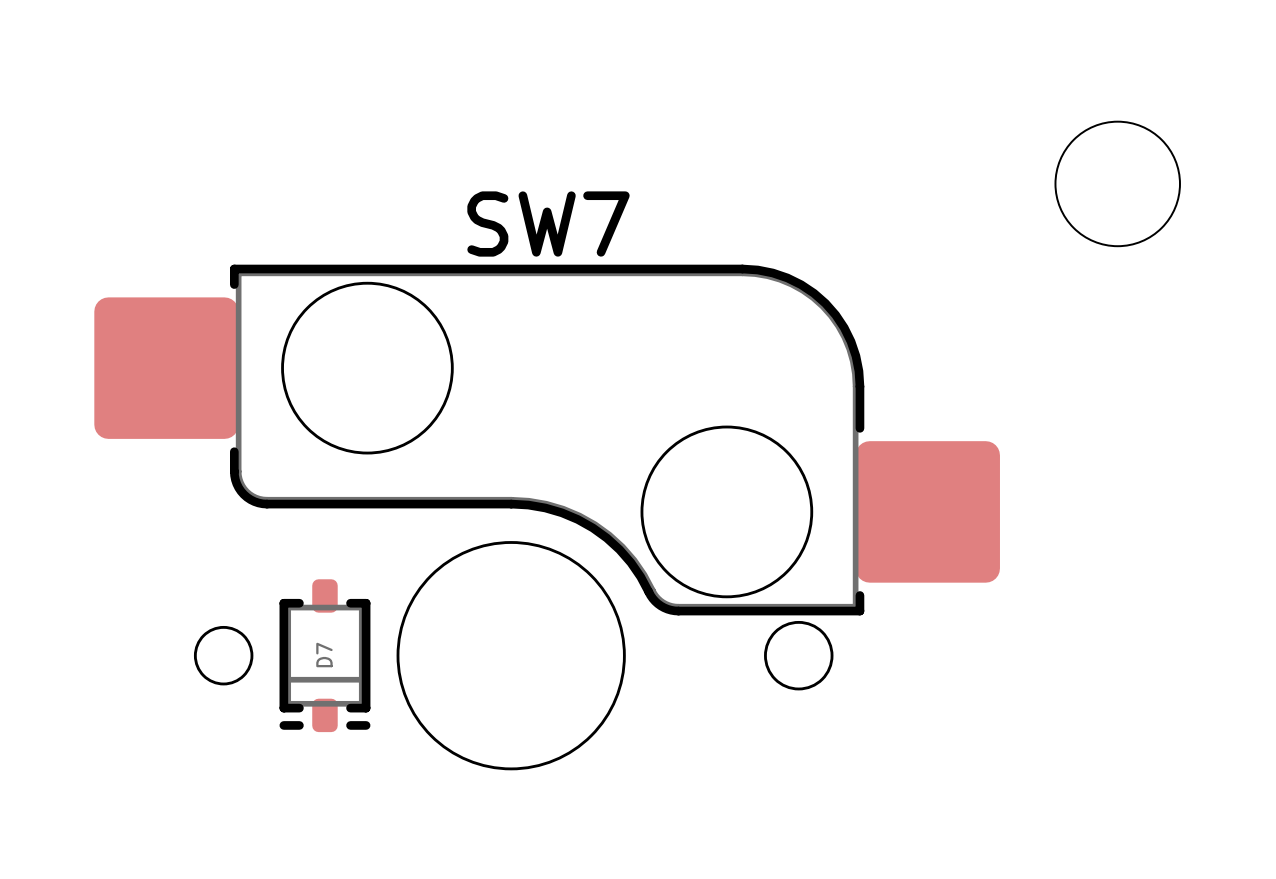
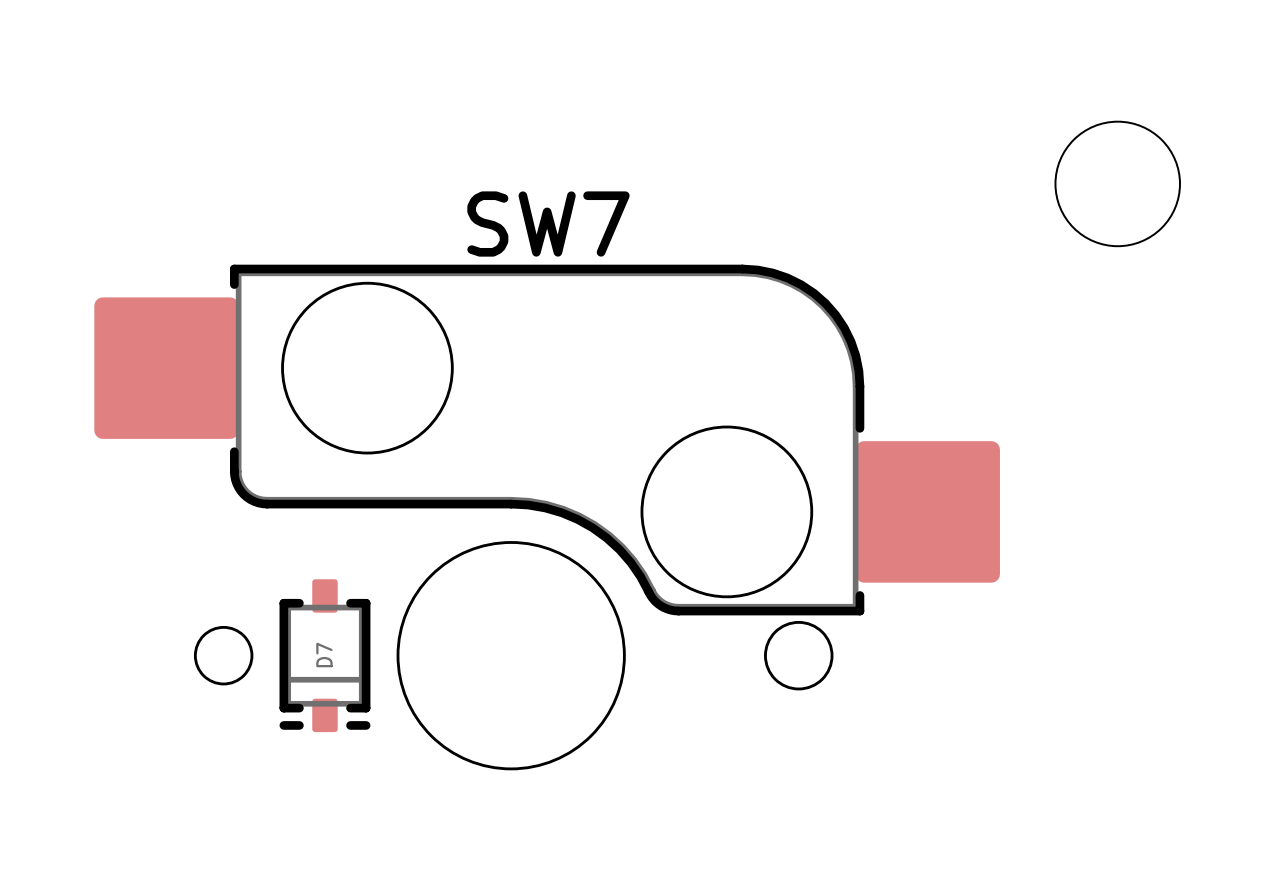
SW7 footprint: [94, 264, 1000, 771] -> [94, 264, 1000, 771]
D7 footprint: [279, 579, 371, 733] -> [279, 579, 371, 733]

